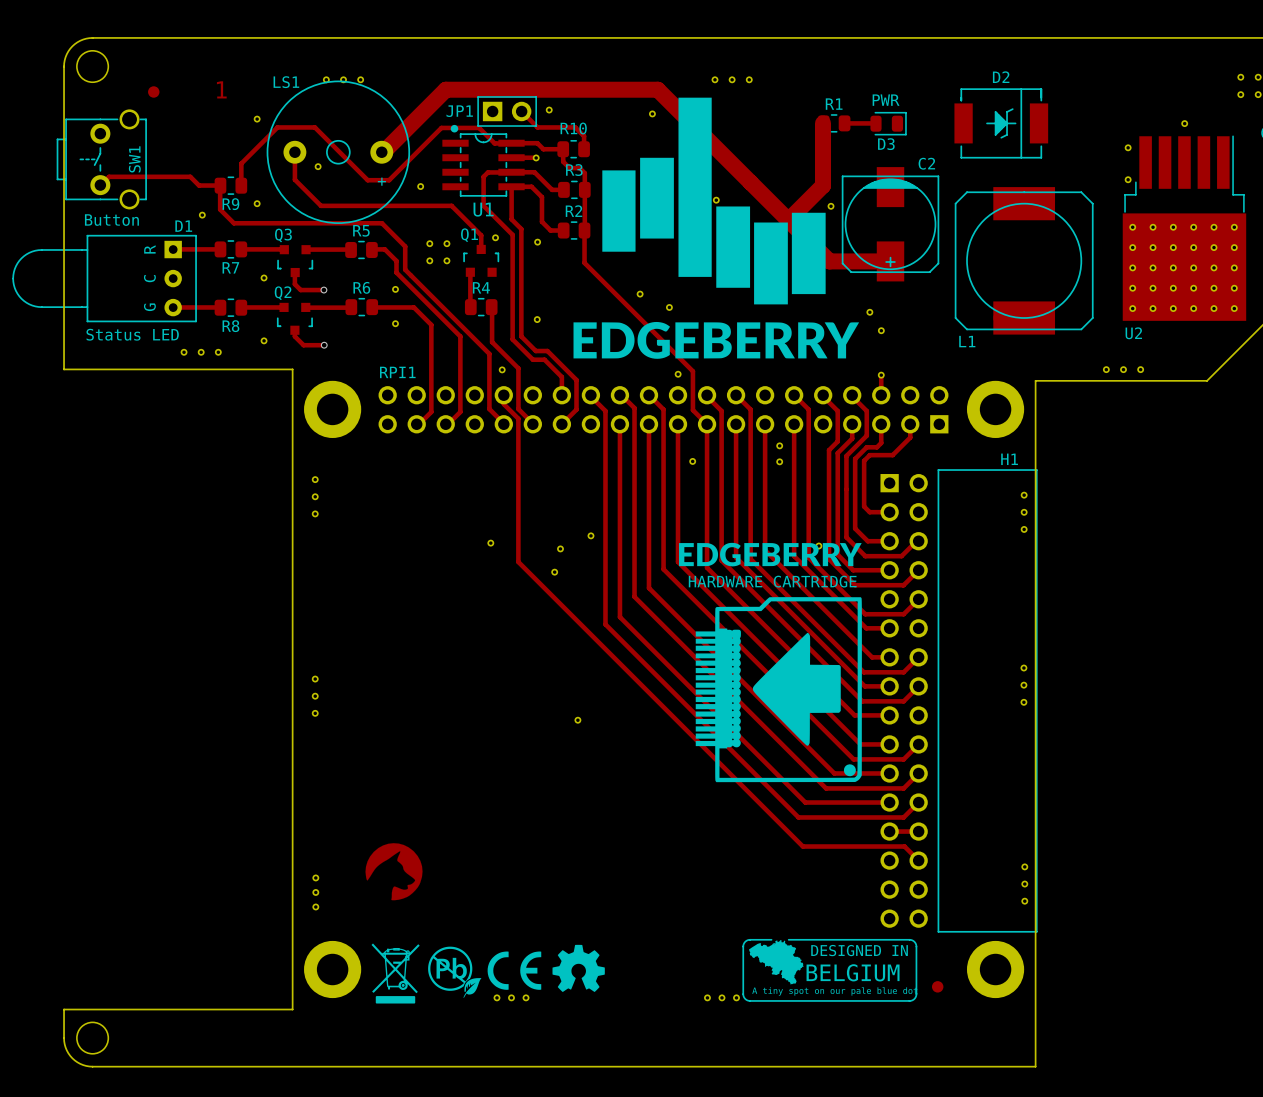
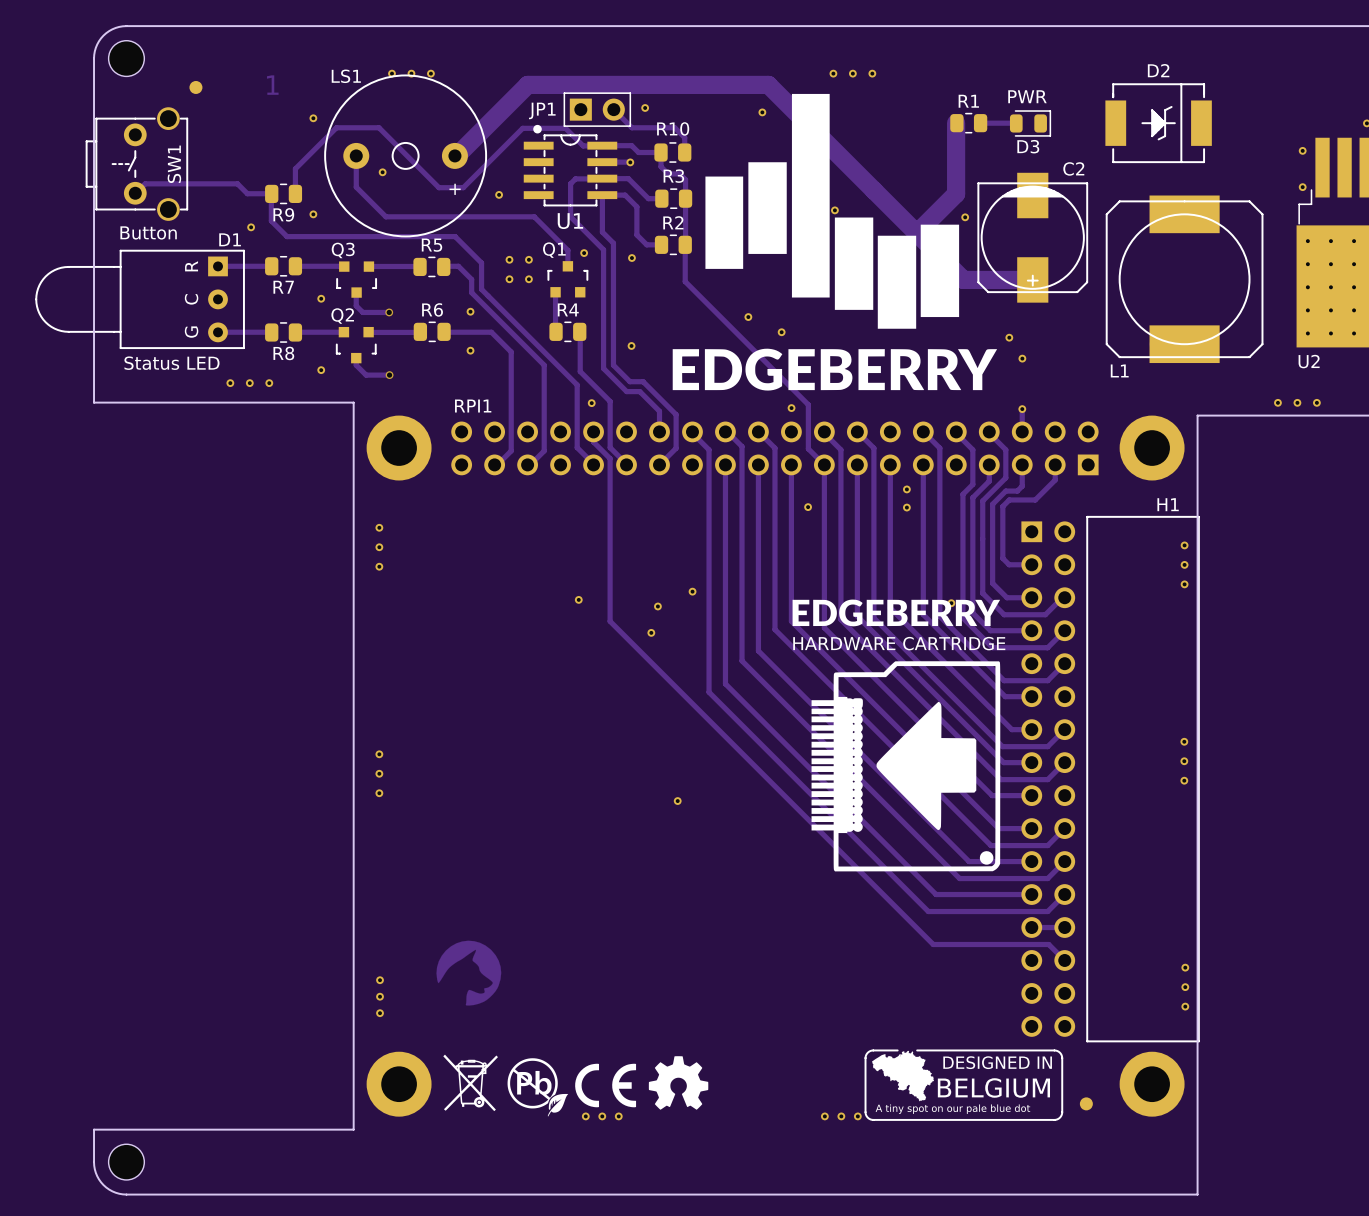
drawing: [375, 996, 416, 1004] -> none

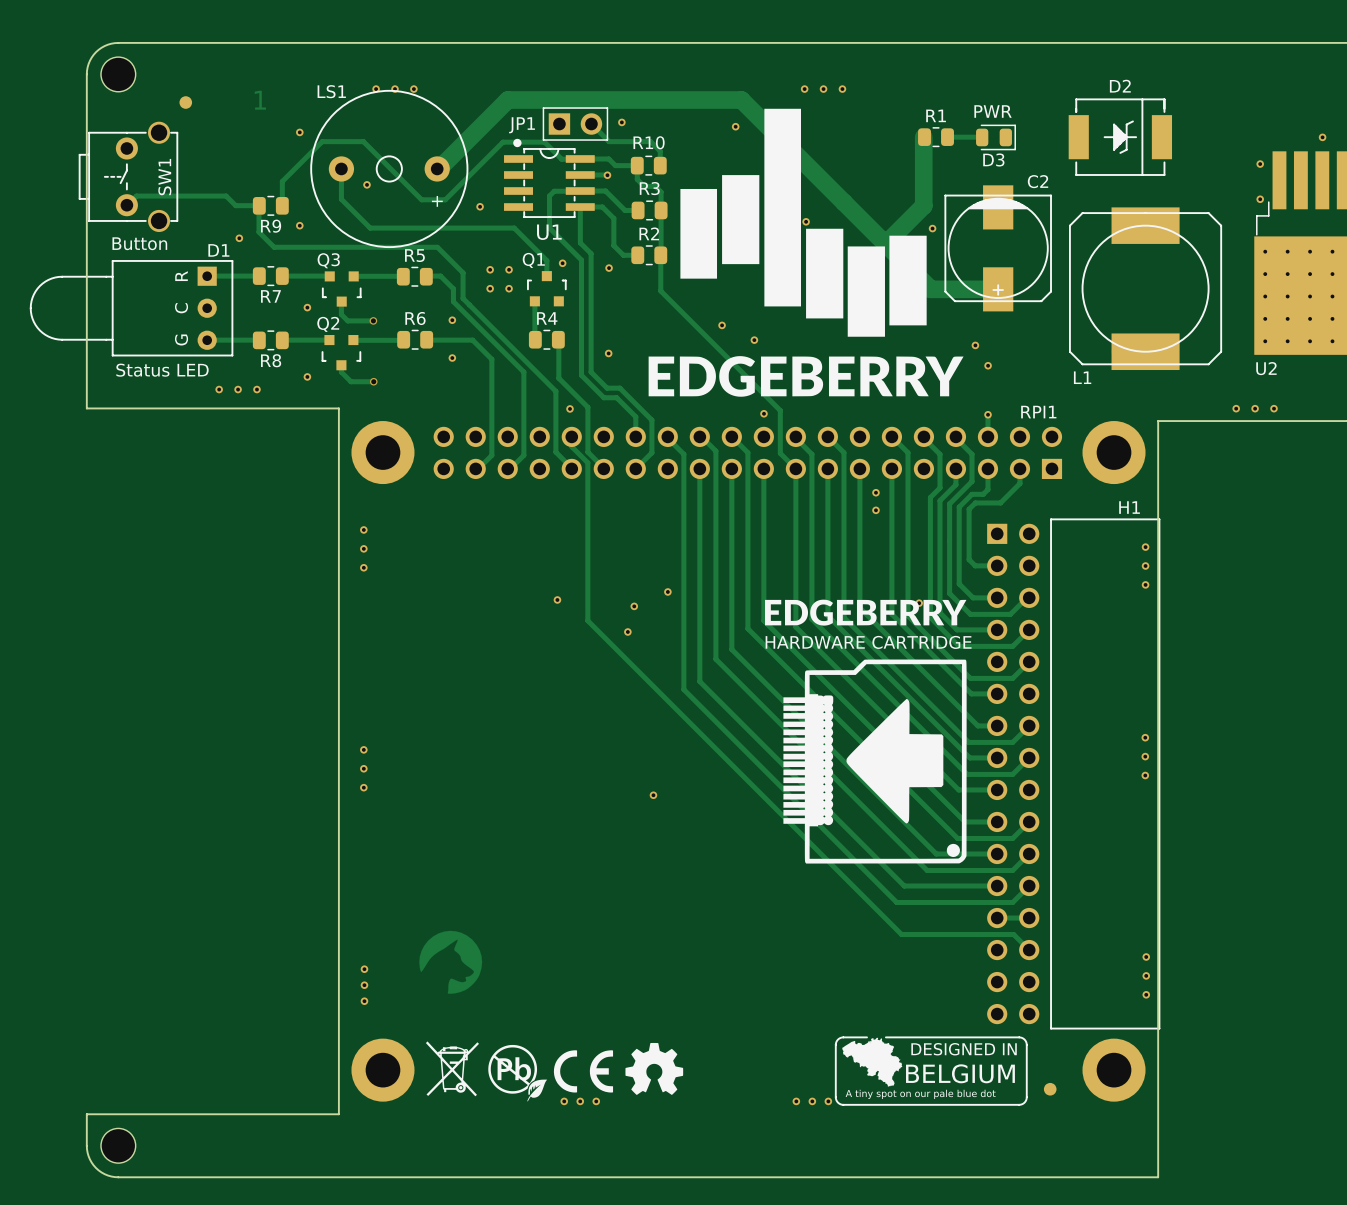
RPI1 name position: RPI1 (473, 406) -> RPI1 (1038, 412)
part: (808, 507) -> none

